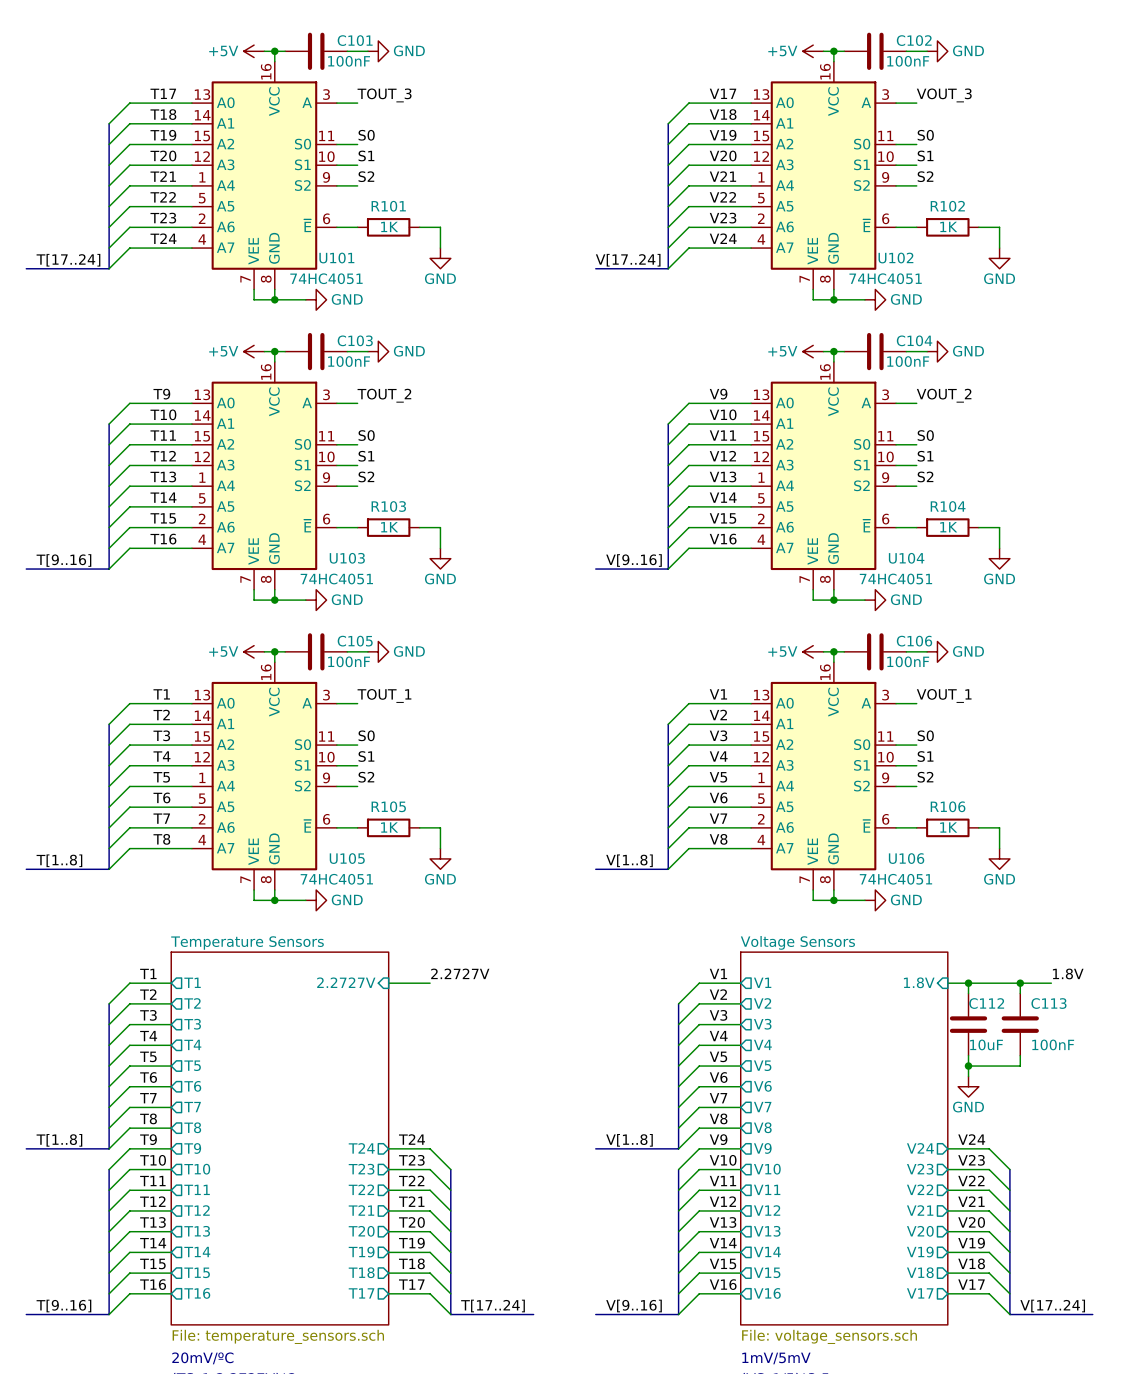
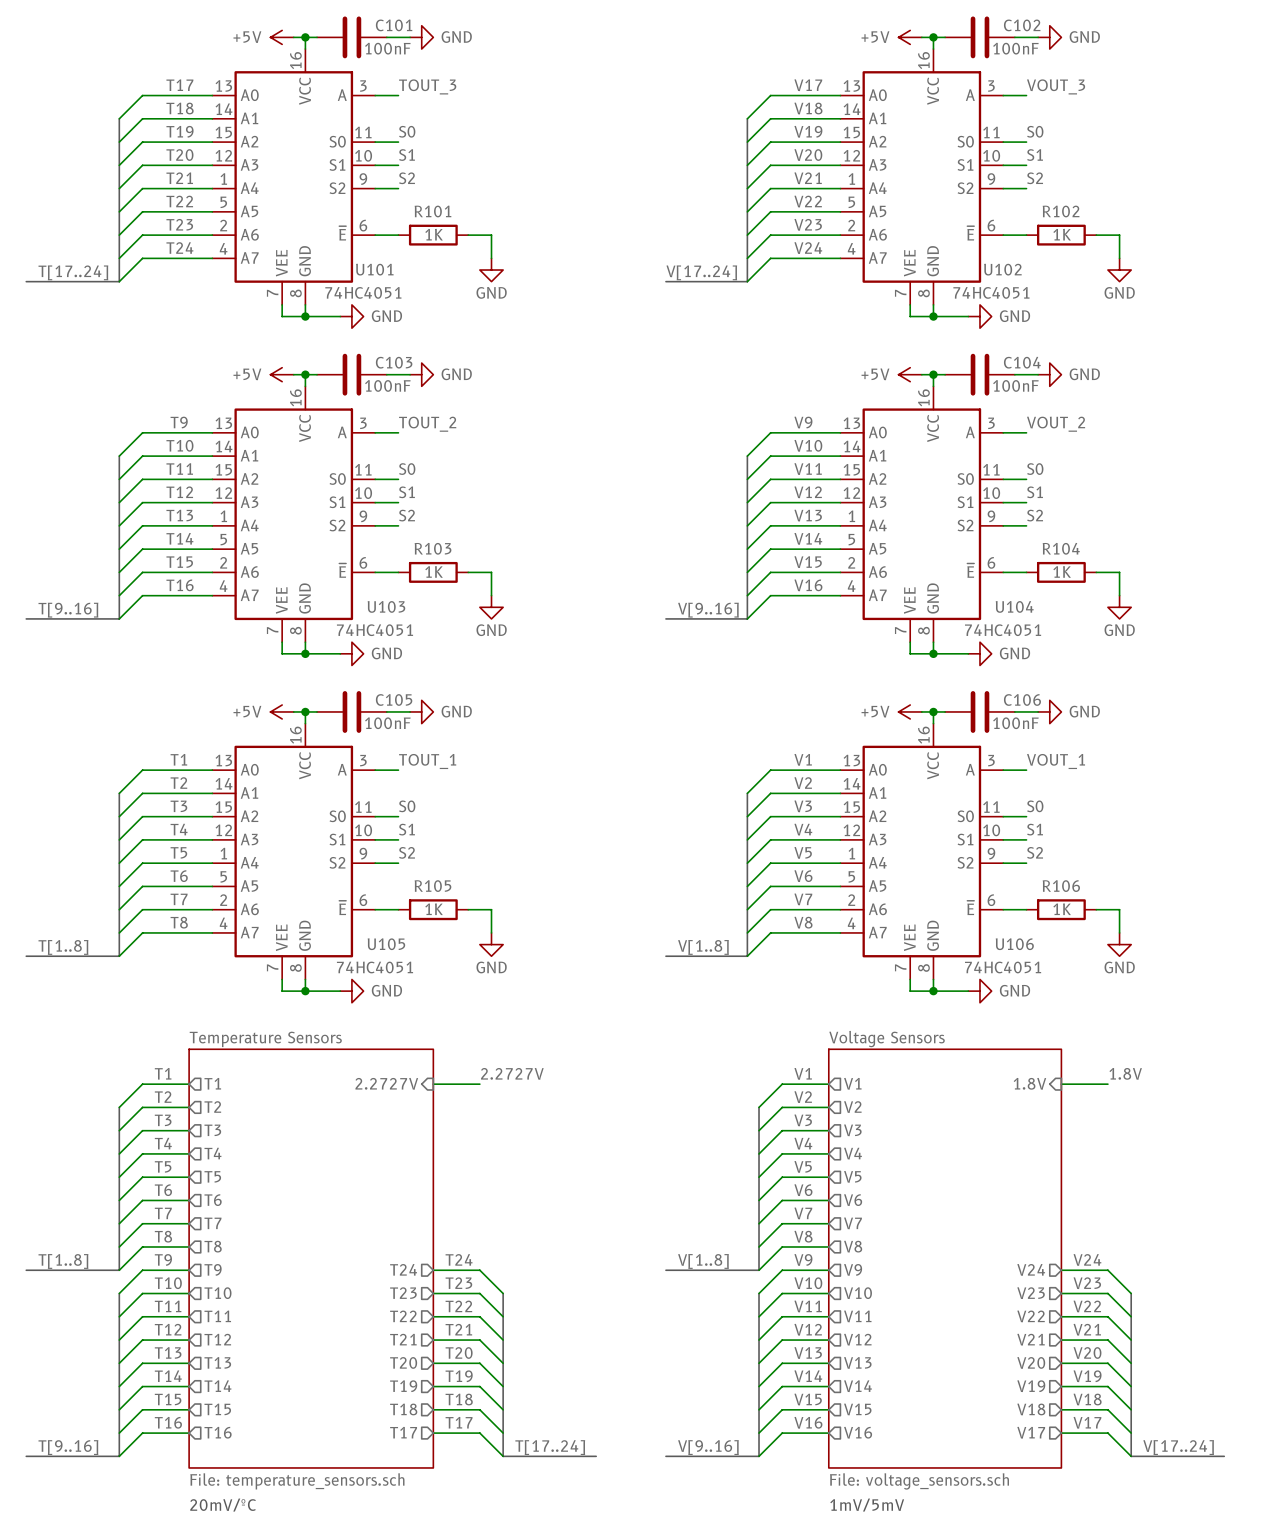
label position: 1.8V (1068, 973) -> 1.8V (1125, 1073)
wire: (968, 983) (968, 993) -> none
junction: (968, 983) -> none
wire: (989, 983) (1051, 983) -> none
wire: (1020, 983) (1020, 993) -> none
junction: (1020, 983) -> none
C112: 10uF (968, 1024) -> none
C113: 100nF (1020, 1024) -> none
wire: (968, 1055) (968, 1076) -> none
wire: (1020, 1055) (1020, 1066) (968, 1066) -> none
junction: (968, 1066) -> none
power symbol: GND (968, 1086) -> none

